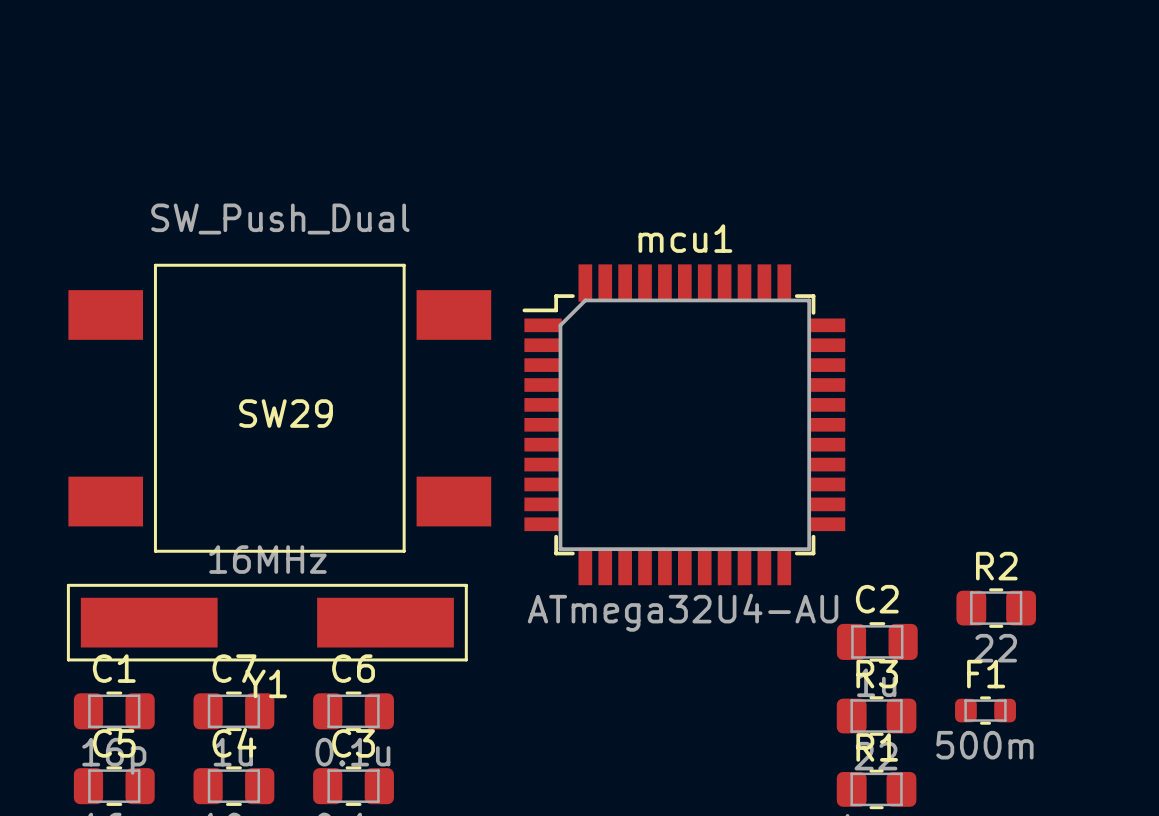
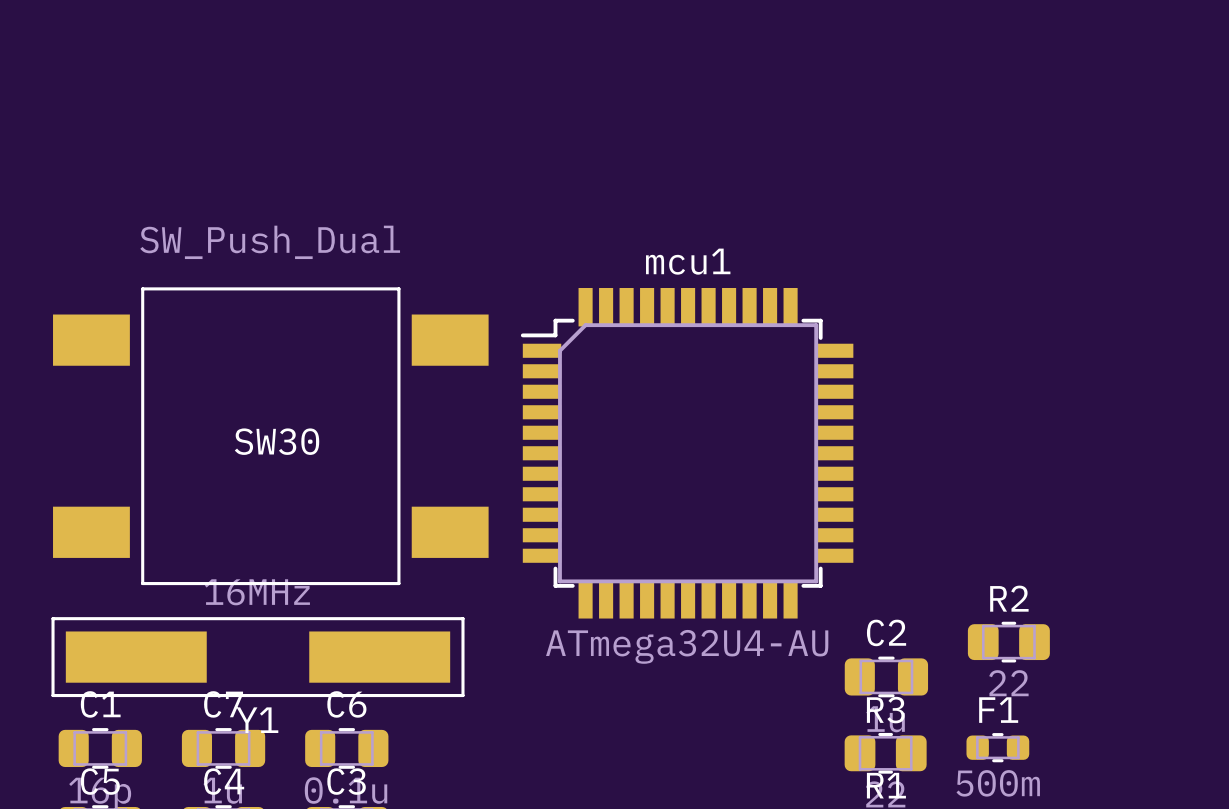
SW29 name: SW29 (286, 413) -> SW30 (277, 441)

